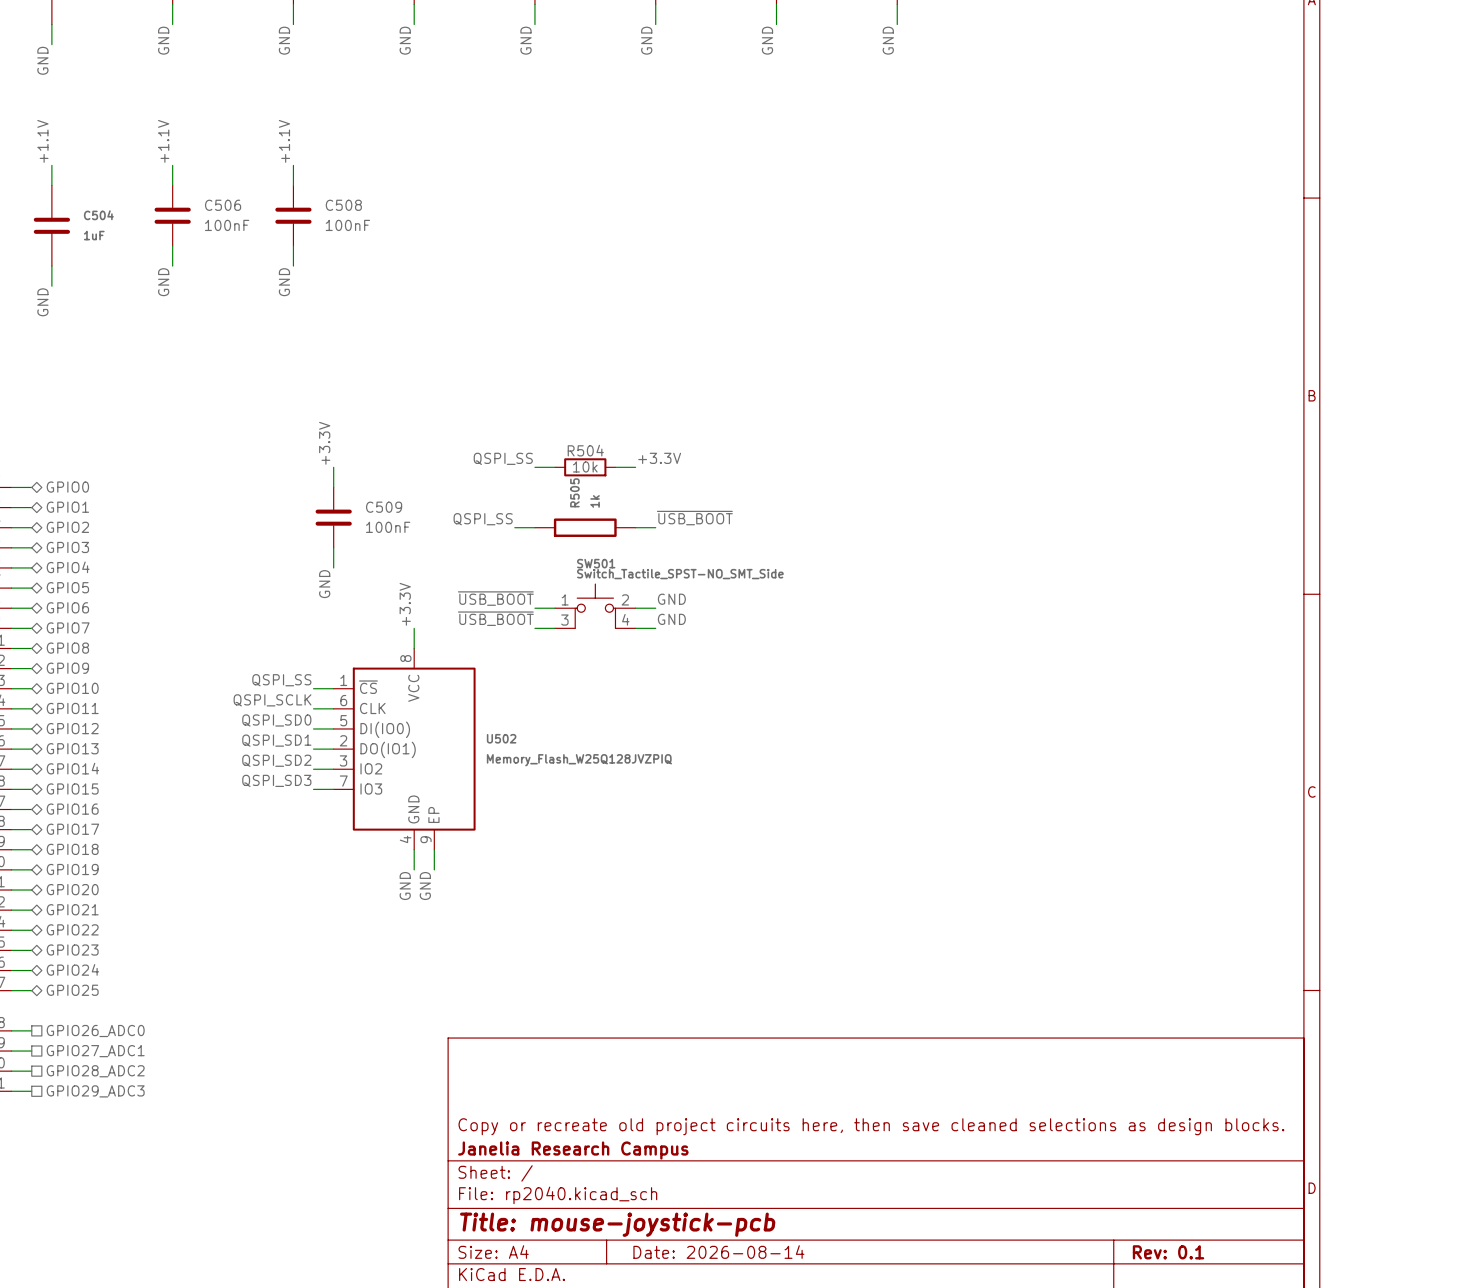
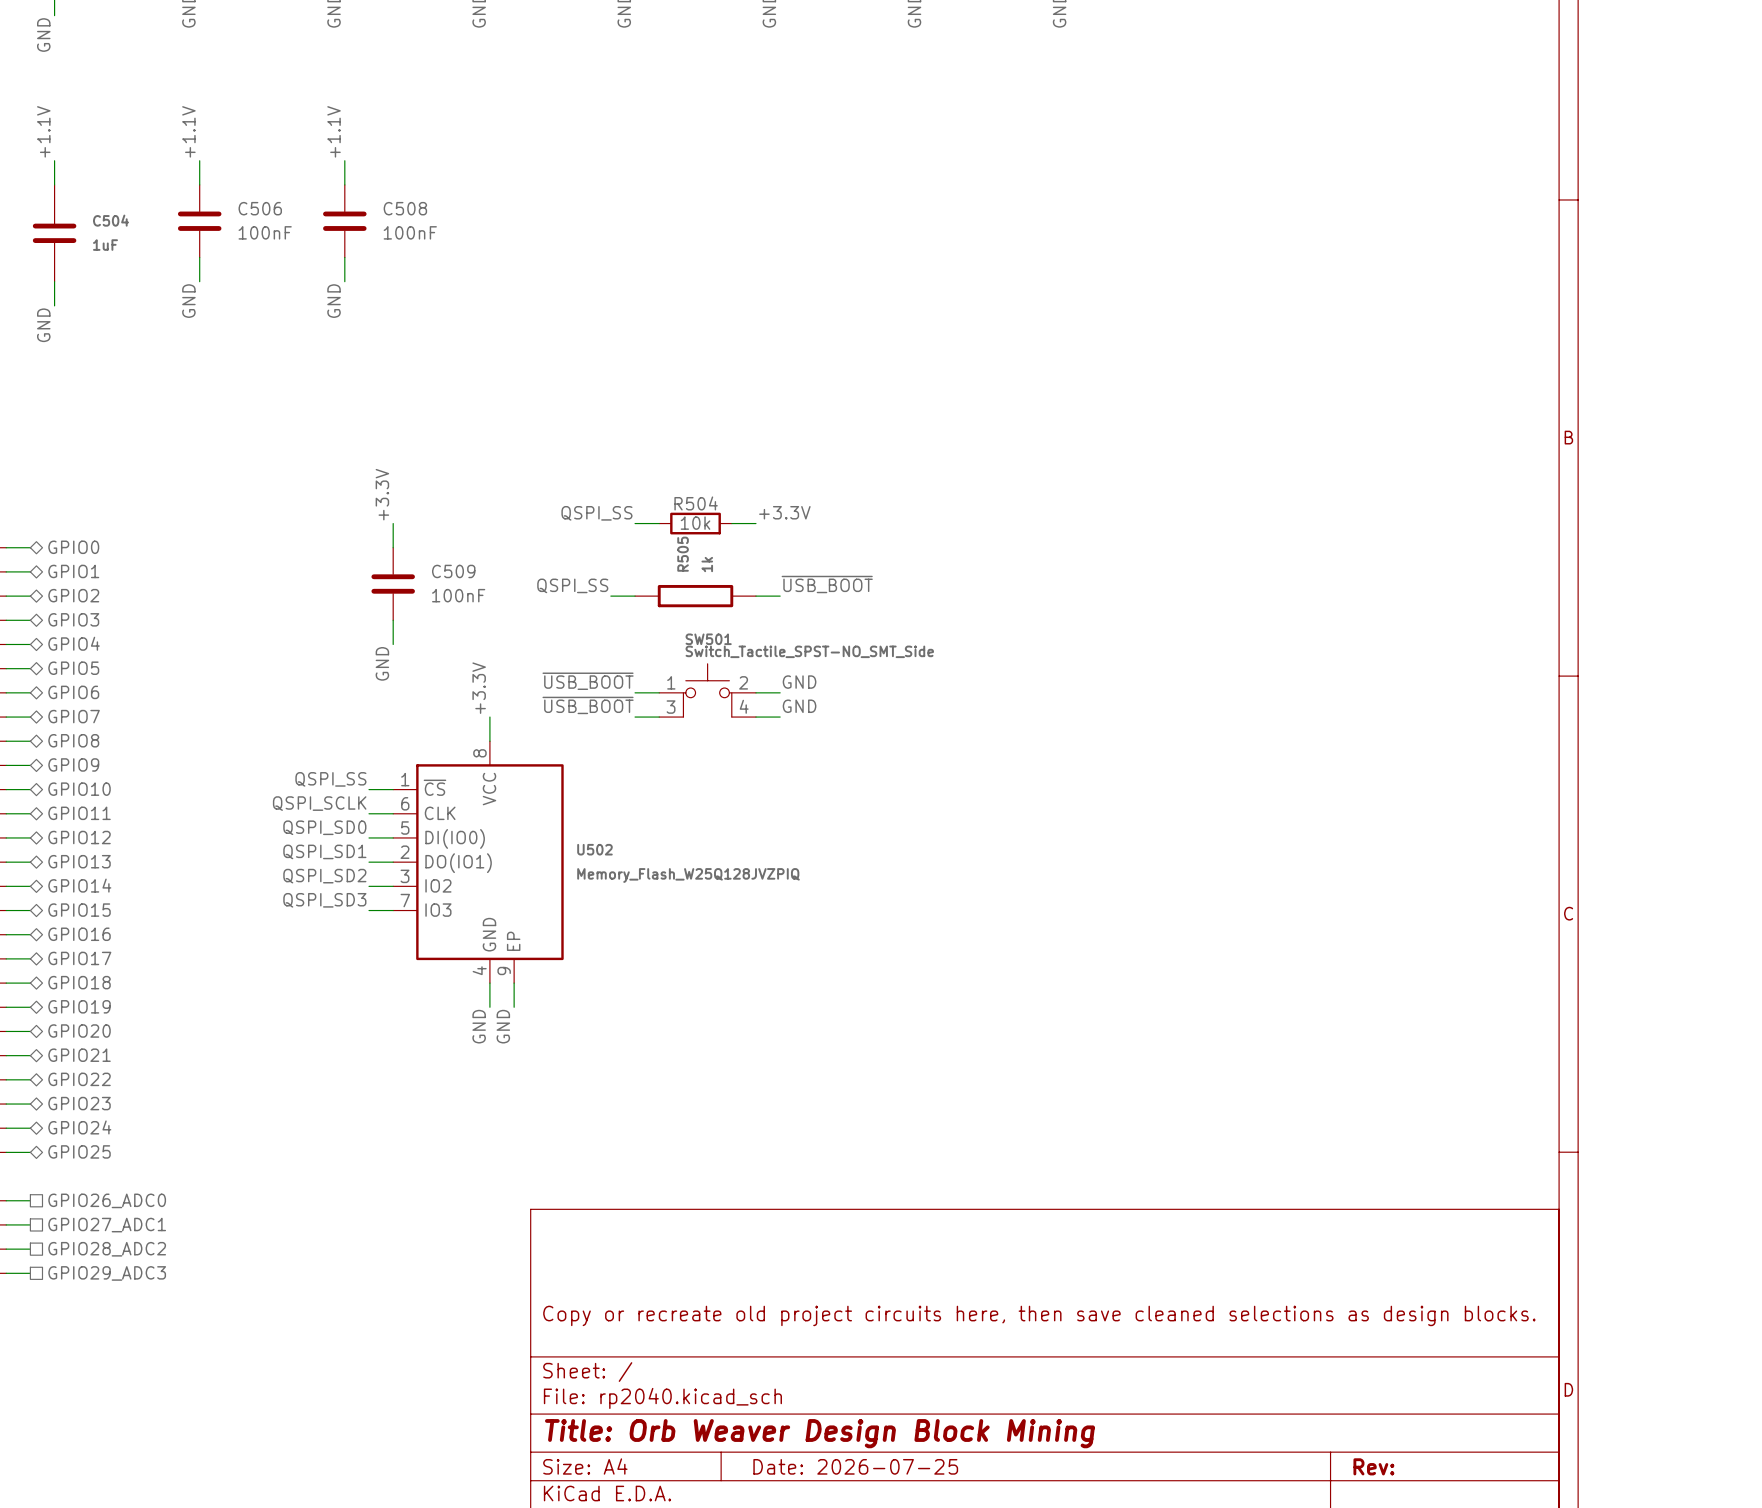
title block: Janelia Research Campus (573, 1150) -> none
title block: Title: mouse-joystick-pcb (617, 1224) -> Title: Orb Weaver Design Block Mining (819, 1433)
title block: Date: 2026-08-14 (718, 1252) -> Date: 2026-07-25 (855, 1466)
title block: Rev: 0.1 (1168, 1252) -> Rev: (1373, 1466)

